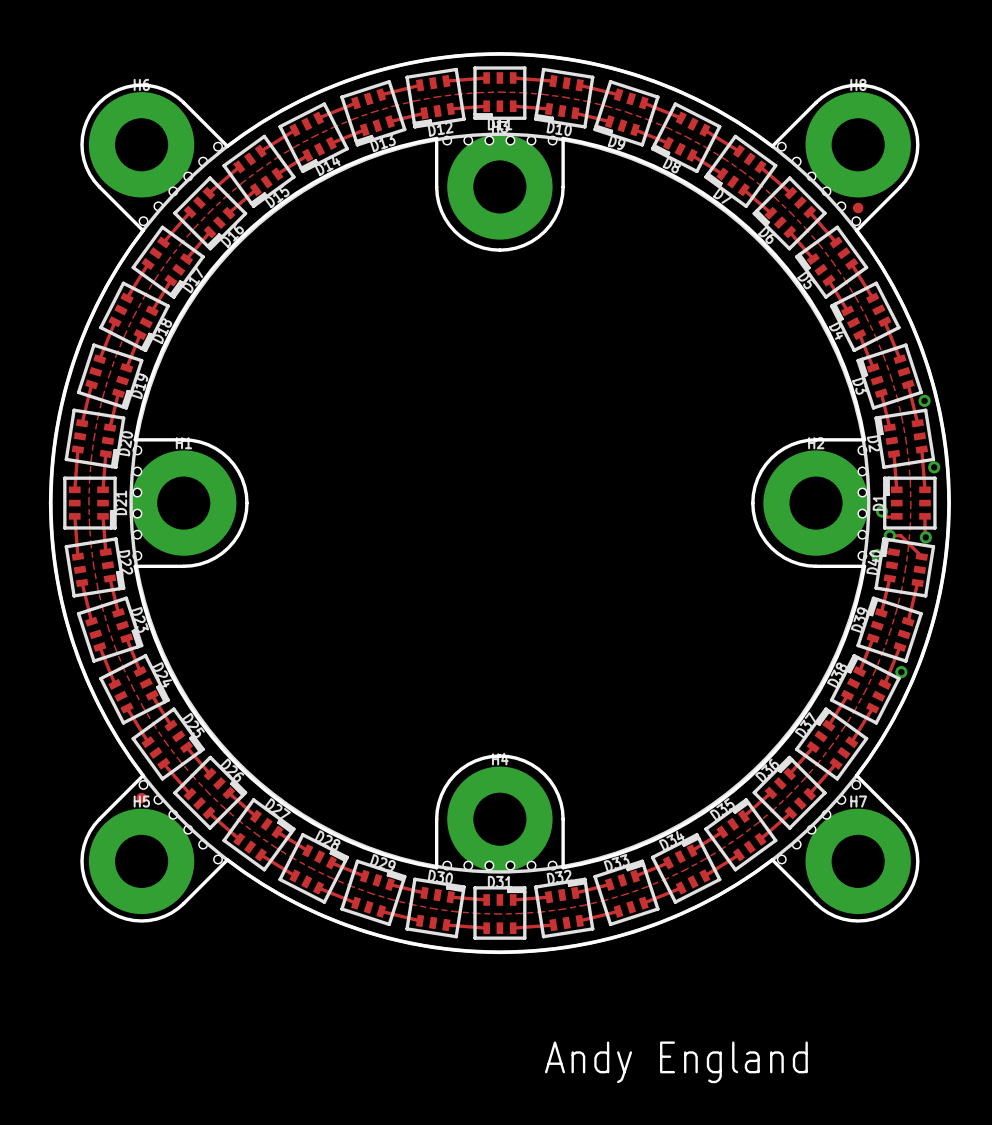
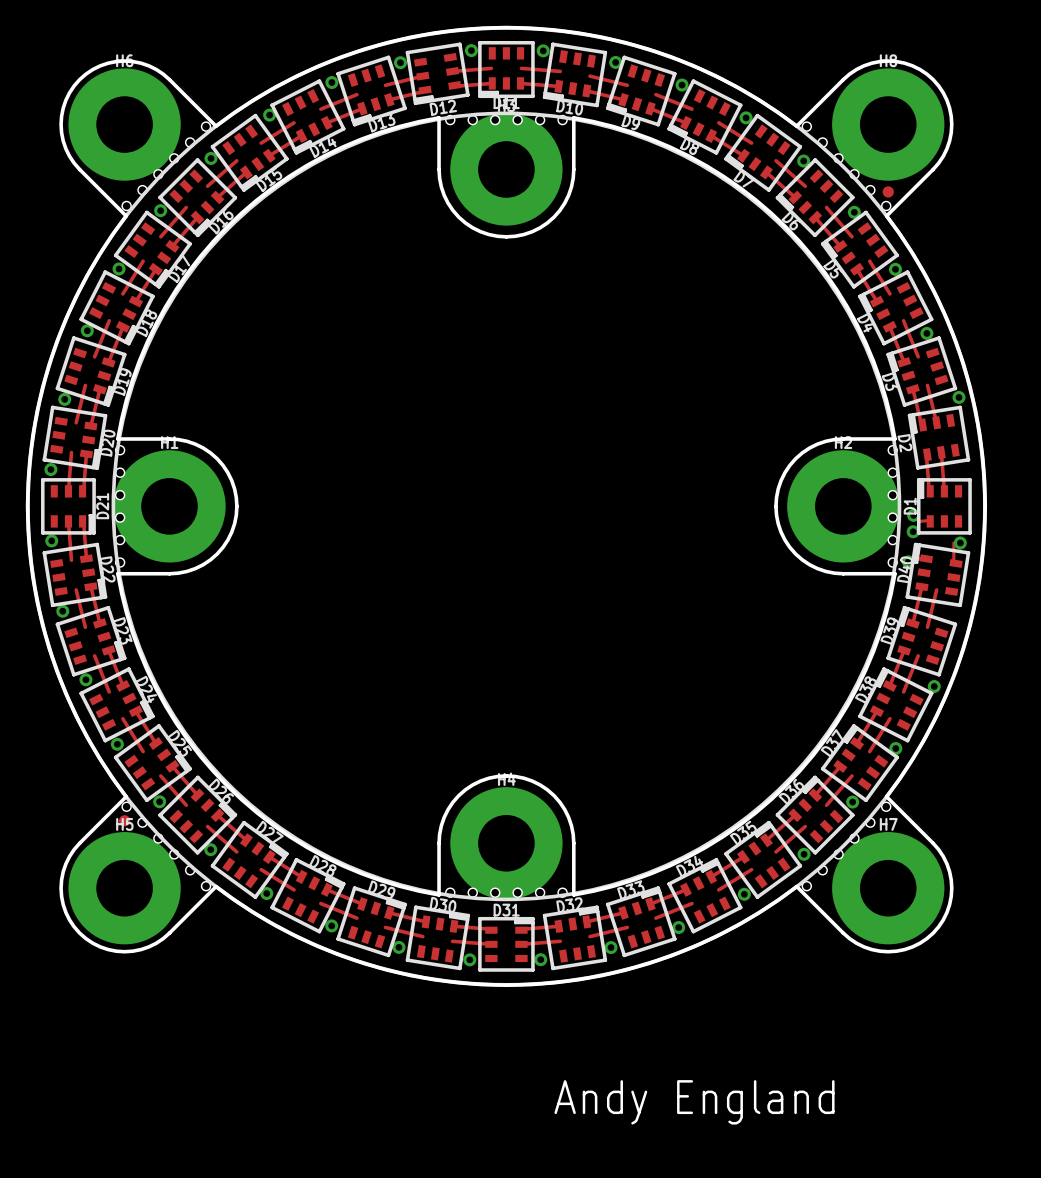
D12 footprint: [405, 67, 466, 129] -> [405, 42, 470, 106]
via: none -> (471, 50)
via: none -> (543, 50)
track: (486, 77) (446, 81) -> none
track: (513, 77) (553, 81) -> none
track: (420, 85) (381, 94) -> none
track: (579, 85) (618, 94) -> none
via: none -> (400, 62)
via: none -> (615, 62)
track: none -> (491, 68) (452, 71)
zone outline: (499, 92) (564, 97) (606, 106) (647, 119) (686, 136) (723, 158) (758, 183) (790, 212) (819, 244) (844, 279) (866, 316) (883, 355) (896, 396) (905, 438) (910, 503) (905, 567) (896, 609) (883, 650) (866, 689) (844, 726) (819, 761) (790, 793) (758, 822) (723, 847) (686, 869) (647, 886) (606, 900) (564, 909) (499, 914) (456, 911) (414, 905) (352, 886) (313, 869) (276, 847) (241, 822) (209, 793) (180, 761) (155, 726) (133, 689) (116, 650) (97, 588) (91, 546) (88, 503) (93, 438) (102, 396) (116, 355) (133, 316) (155, 279) (180, 244) (209, 212) (241, 183) (276, 158) (313, 136) (352, 119) (393, 106) (435, 97) (499, 92) -> none
track: none -> (521, 68) (560, 71)
track: none -> (422, 76) (385, 85)
track: none -> (589, 76) (627, 85)
track: (356, 103) (318, 118) -> none
track: (643, 103) (681, 118) -> none
via: none -> (331, 82)
via: none -> (682, 85)
track: none -> (356, 94) (320, 109)
track: none -> (655, 94) (692, 109)
track: (294, 130) (260, 151) -> none
track: (704, 130) (738, 151) -> none
via: none -> (269, 115)
via: none -> (746, 117)
track: none -> (294, 122) (261, 143)
track: none -> (718, 122) (751, 143)
track: (239, 166) (208, 193) -> none
track: (760, 166) (790, 193) -> none
via: none -> (211, 158)
track: none -> (236, 160) (207, 186)
track: none -> (775, 160) (805, 186)
via: none -> (803, 161)
track: (190, 212) (163, 242) -> none
track: (809, 212) (836, 242) -> none
track: none -> (186, 207) (160, 236)
track: none -> (826, 207) (852, 236)
via: none -> (160, 210)
via: none -> (854, 212)
track: (148, 264) (127, 298) -> none
track: (851, 264) (872, 298) -> none
track: none -> (143, 261) (122, 293)
track: none -> (869, 261) (889, 293)
via: none -> (119, 268)
via: none -> (895, 269)
track: (114, 321) (99, 359) -> none
track: (884, 321) (899, 359) -> none
track: none -> (109, 320) (94, 356)
track: none -> (903, 320) (918, 356)
via: none -> (87, 330)
via: none -> (926, 333)
track: (91, 384) (82, 423) -> none
track: (908, 384) (917, 423) -> none
track: none -> (85, 385) (76, 422)
track: none -> (927, 385) (936, 422)
via: none -> (64, 399)
D2 footprint: [874, 408, 936, 469] -> [907, 405, 971, 470]
track: (77, 449) (74, 489) -> none
track: (921, 449) (924, 489) -> none
track: none -> (71, 452) (68, 491)
track: none -> (941, 452) (944, 491)
via: (934, 467) -> none
via: none -> (50, 469)
D21 footprint: [63, 476, 117, 530] -> [41, 478, 96, 535]
D1 footprint: [883, 476, 937, 530] -> [916, 478, 972, 535]
track: (74, 516) (77, 556) -> none
track: (924, 516) (925, 537) -> none
track: none -> (68, 521) (71, 560)
via: none -> (51, 540)
track: (889, 535) (900, 535) (921, 556) -> none
via position: (889, 535) -> (913, 531)
track: none -> (953, 542) (955, 562)
track: none -> (76, 589) (85, 627)
track: none -> (936, 589) (927, 627)
track: (82, 582) (91, 621) -> none
track: (917, 582) (908, 621) -> none
via: none -> (62, 611)
track: none -> (94, 655) (109, 691)
track: none -> (918, 655) (903, 691)
track: (99, 646) (114, 684) -> none
track: (899, 646) (884, 684) -> none
via: none -> (85, 679)
track: none -> (122, 718) (143, 751)
track: none -> (889, 718) (869, 751)
track: (127, 708) (148, 742) -> none
track: (872, 708) (851, 742) -> none
via: none -> (117, 744)
via: none -> (895, 748)
track: none -> (160, 775) (186, 805)
track: none -> (852, 775) (826, 805)
track: (163, 763) (190, 794) -> none
track: (836, 763) (809, 794) -> none
via: none -> (159, 801)
via: none -> (852, 802)
track: none -> (207, 826) (236, 851)
track: none -> (805, 826) (775, 851)
track: (208, 812) (239, 839) -> none
track: (790, 812) (760, 839) -> none
via: none -> (210, 849)
via: none -> (804, 854)
track: none -> (261, 869) (294, 889)
track: none -> (751, 869) (718, 889)
track: (260, 854) (294, 875) -> none
track: (738, 854) (704, 875) -> none
via: none -> (266, 893)
via: none -> (744, 894)
track: none -> (320, 903) (356, 918)
track: none -> (692, 903) (655, 918)
D31 footprint: [473, 886, 527, 940] -> [478, 916, 535, 972]
track: (318, 887) (356, 903) -> none
track: (681, 887) (643, 903) -> none
via: none -> (331, 925)
track: none -> (385, 927) (422, 936)
track: none -> (627, 927) (589, 936)
via: none -> (678, 927)
track: (381, 911) (420, 920) -> none
track: none -> (452, 941) (491, 944)
track: none -> (560, 941) (521, 944)
track: (618, 911) (579, 920) -> none
via: none -> (398, 947)
via: none -> (611, 947)
track: (446, 925) (486, 928) -> none
track: (553, 925) (513, 928) -> none
via: none -> (469, 959)
via: none -> (540, 959)

